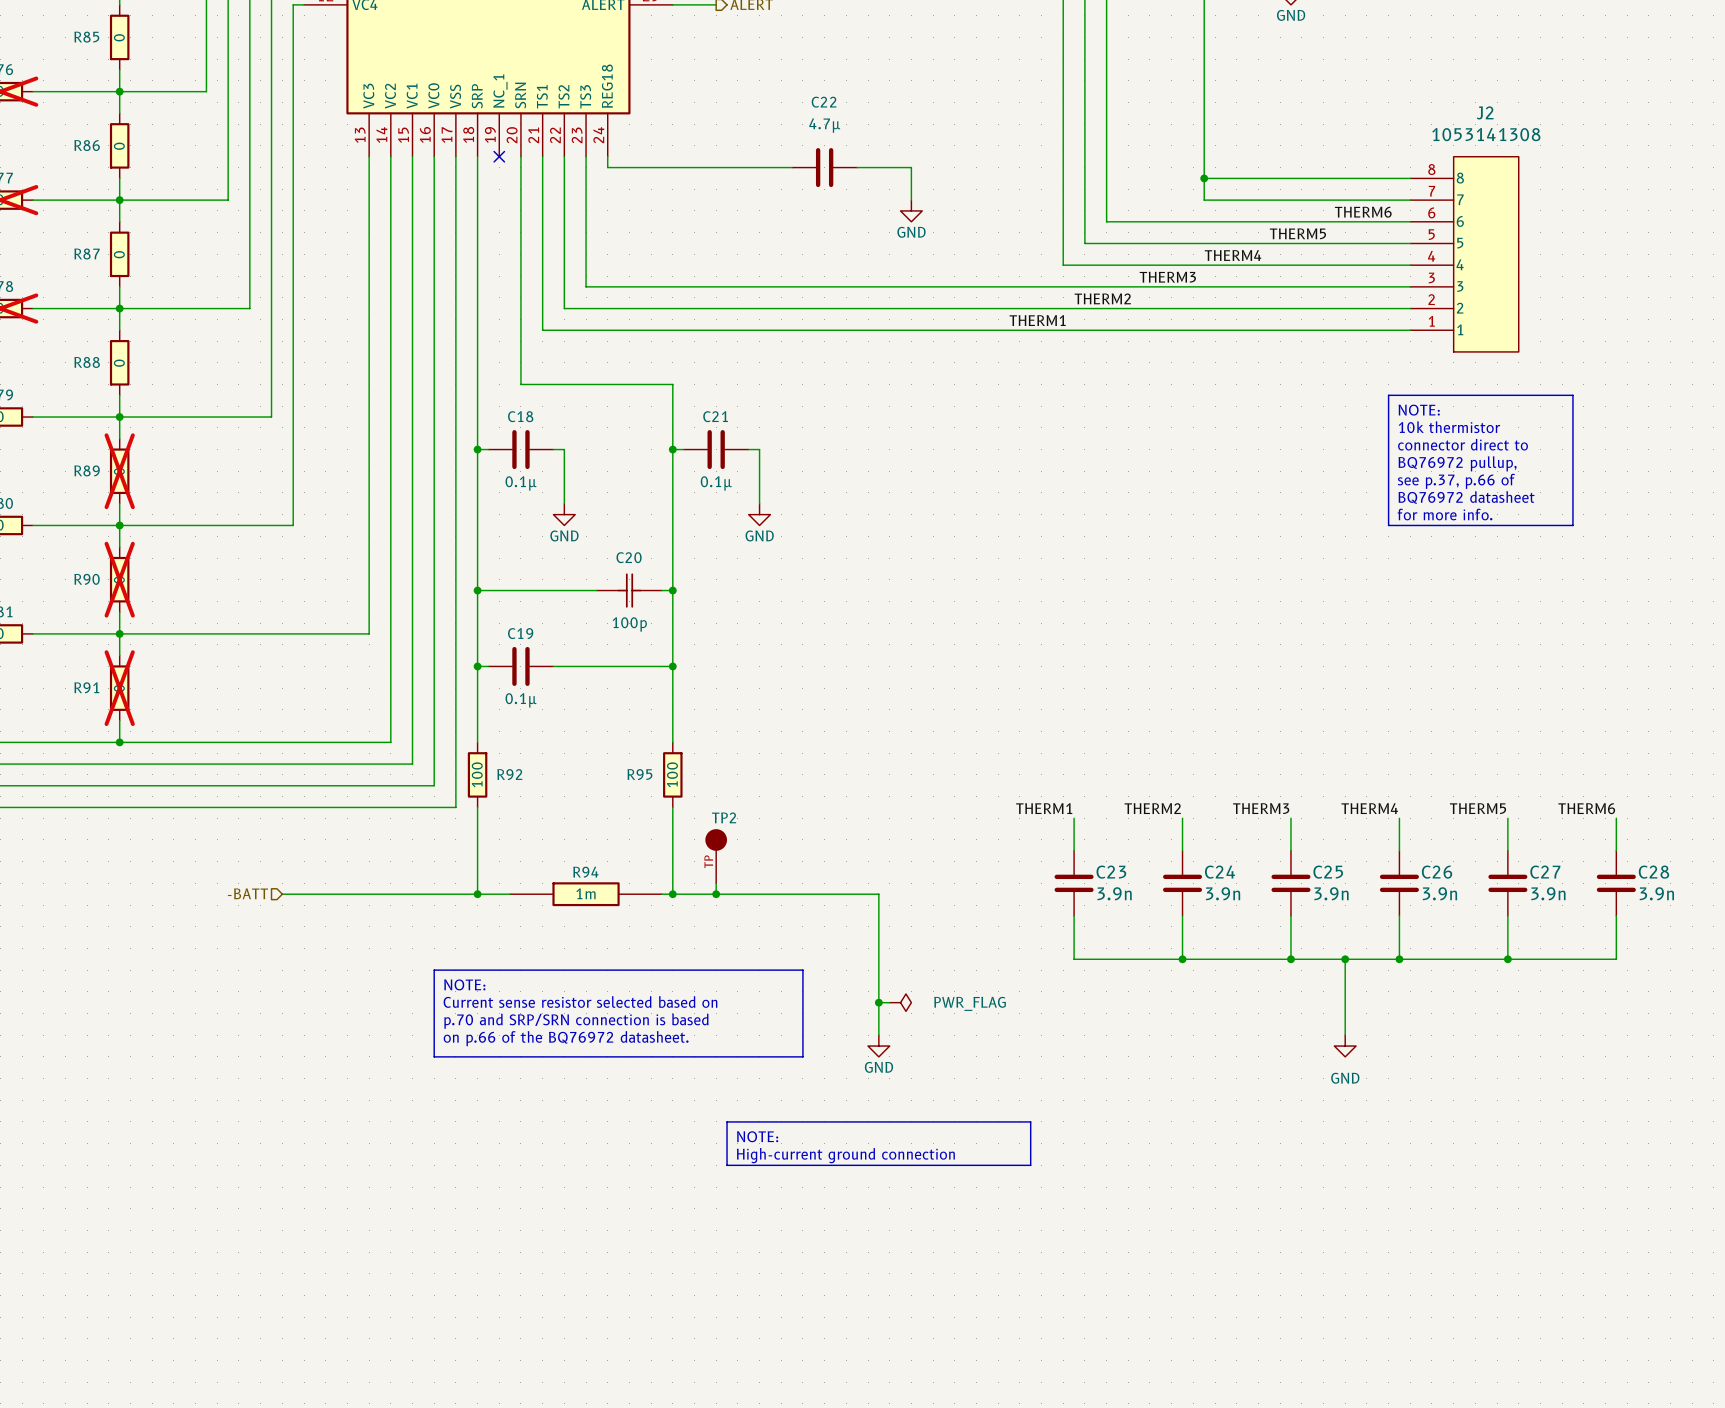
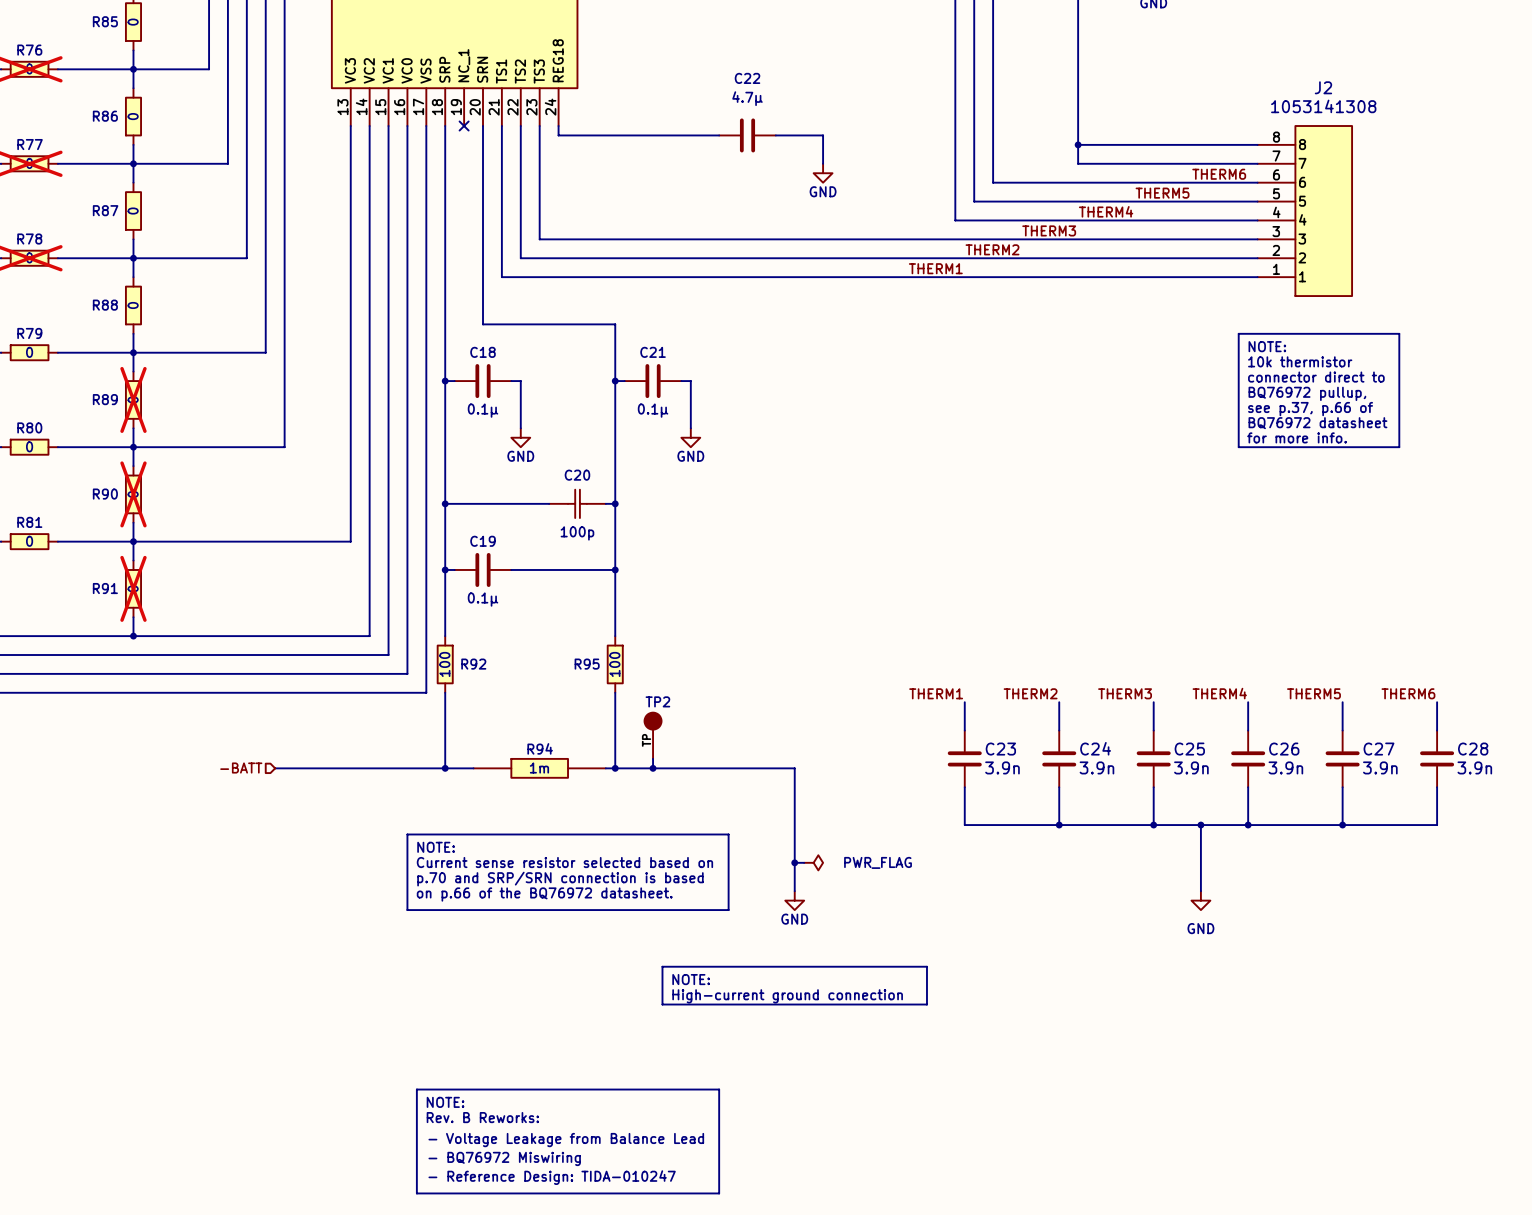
line: none -> (416, 1089) (719, 1089) (719, 1193) (416, 1193) (416, 1089)
text: none -> NOTE: (445, 1102)
text: none -> Rev. B Reworks: (482, 1117)
text: none -> - Voltage Leakage from Balance Lead (566, 1140)
text: none -> - BQ76972 Miswiring (504, 1158)
text: none -> - Reference Design: TIDA-010247 (552, 1177)

